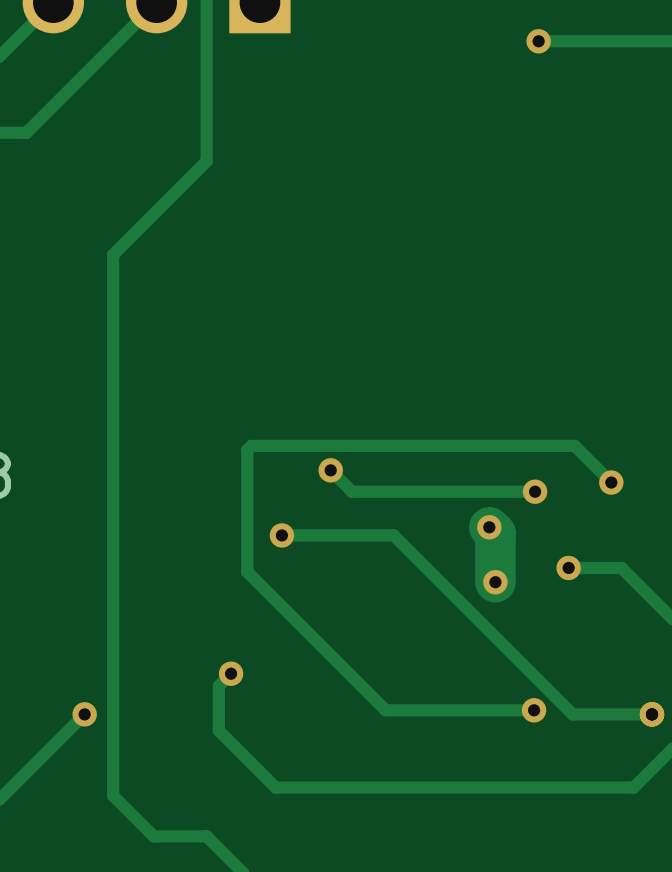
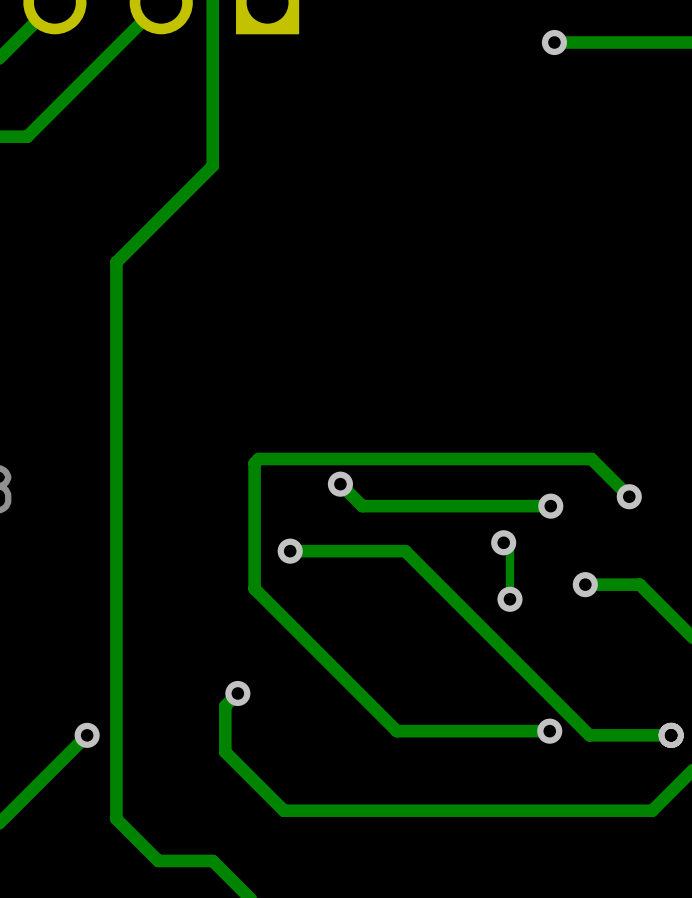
track width: thick (489, 527) (495, 533) (495, 582) -> thin (503, 542) (509, 549) (509, 599)

